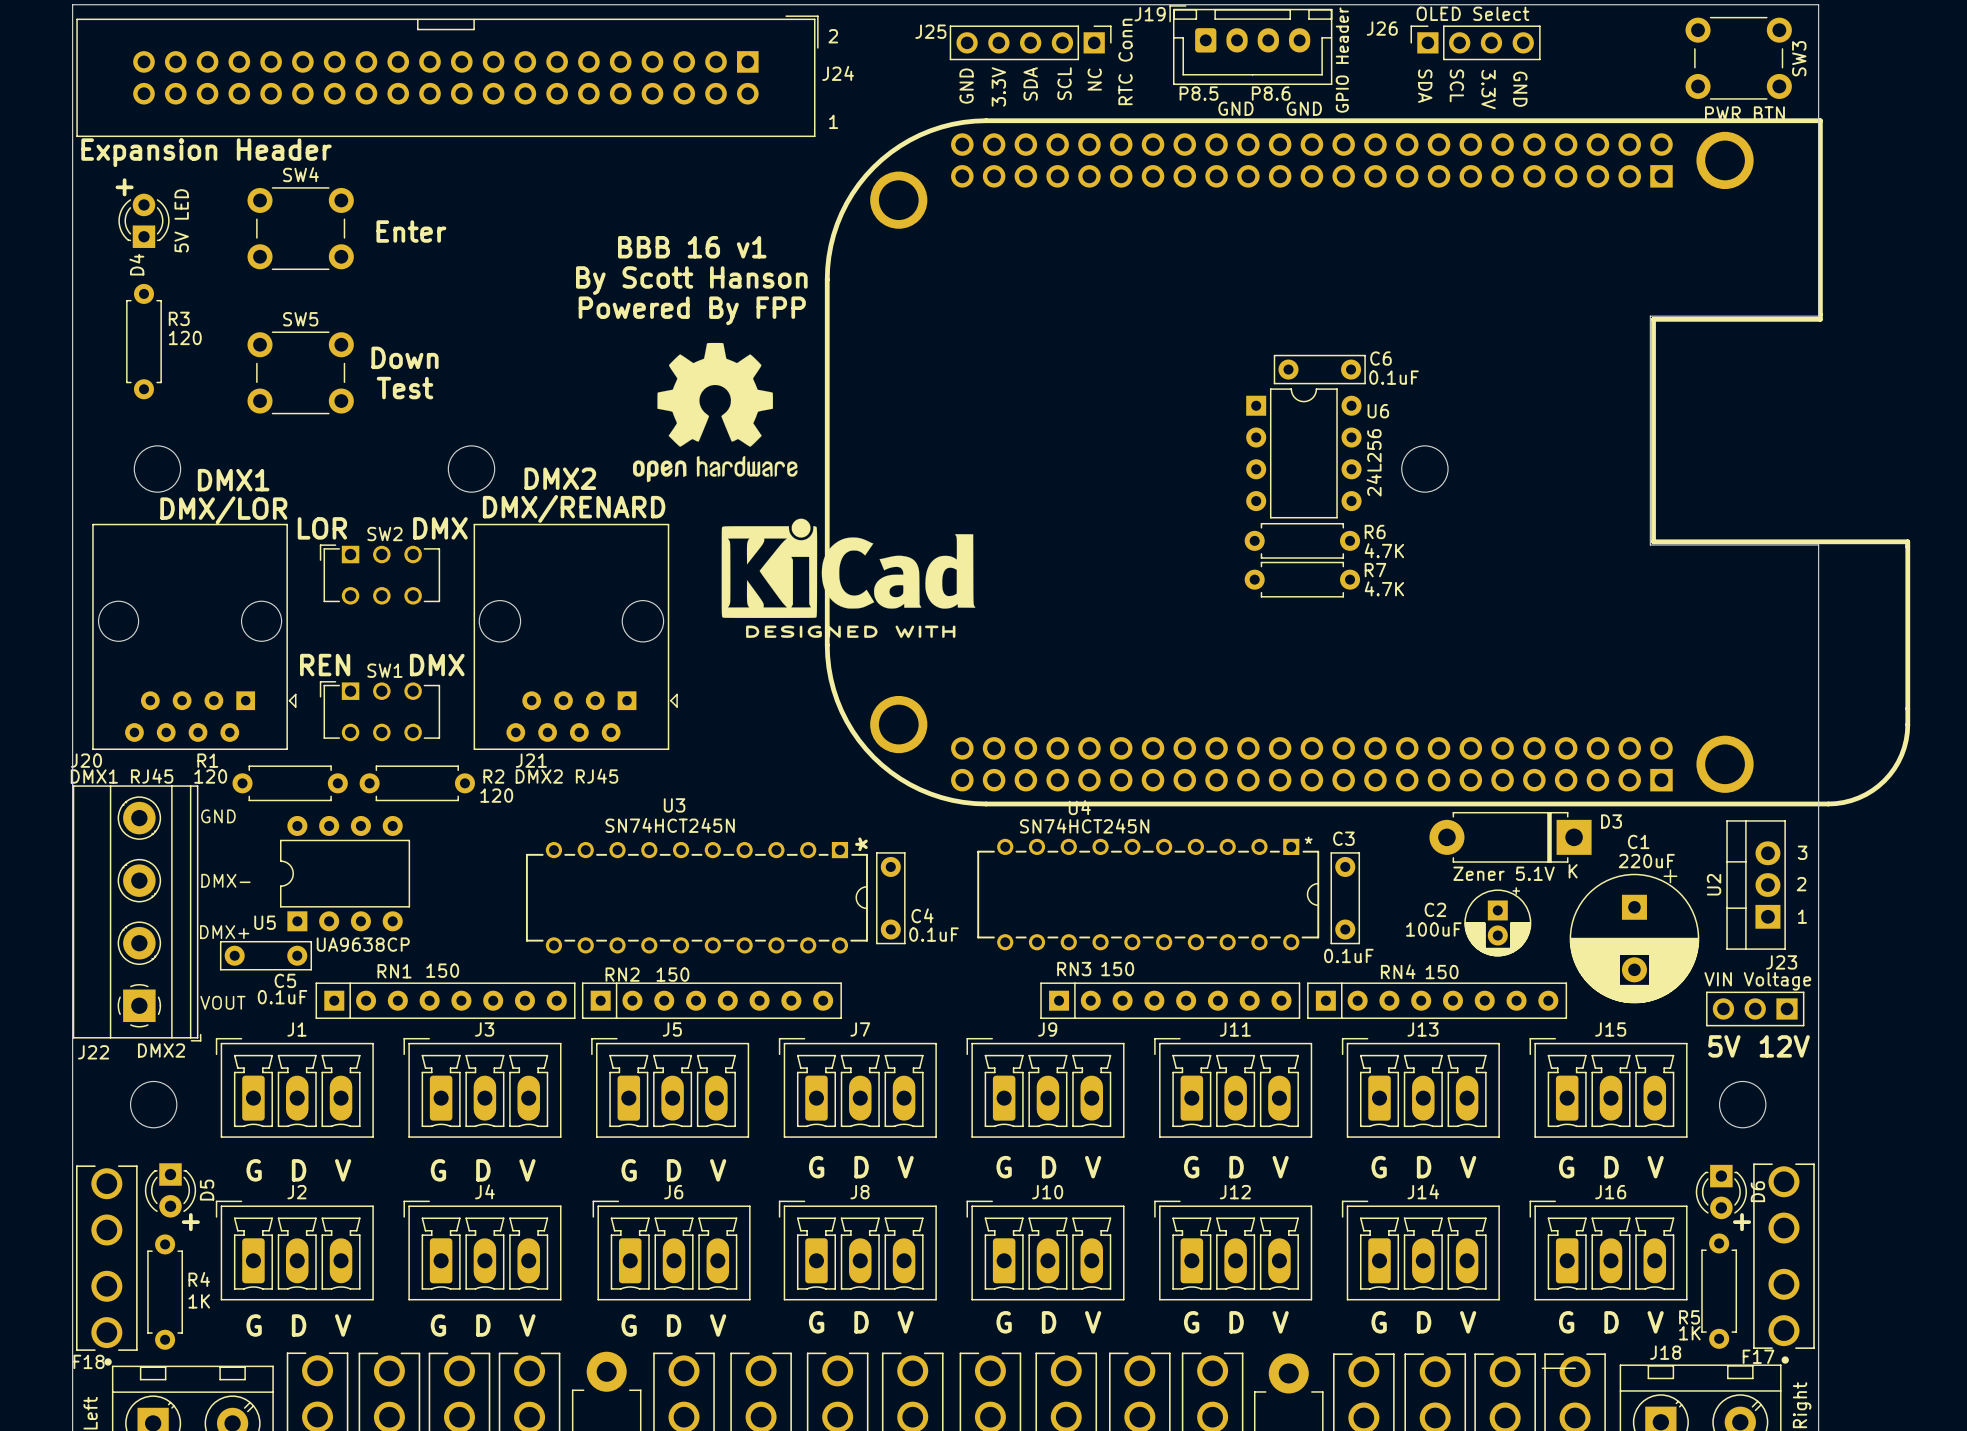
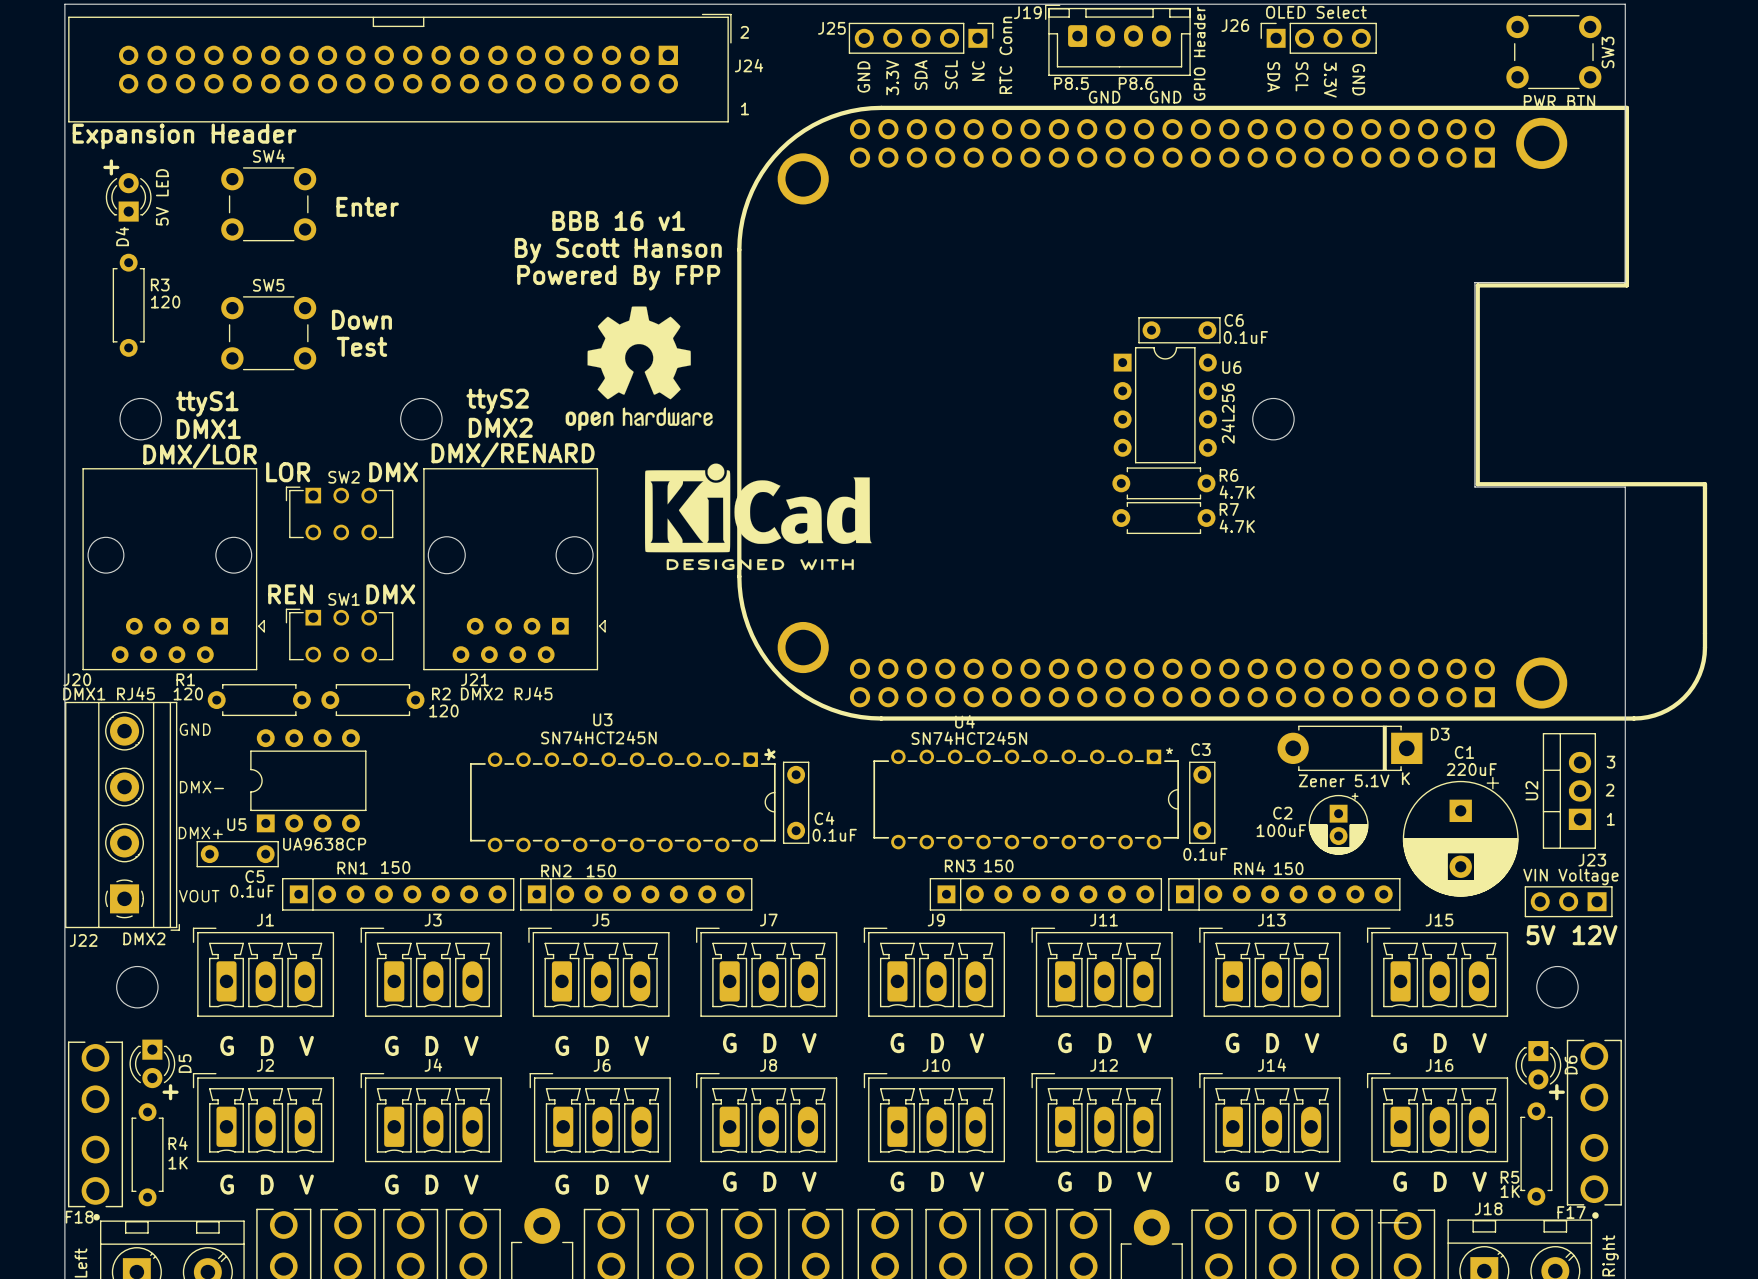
text: none -> ttyS2 (497, 401)
text: none -> ttyS1 (207, 404)

